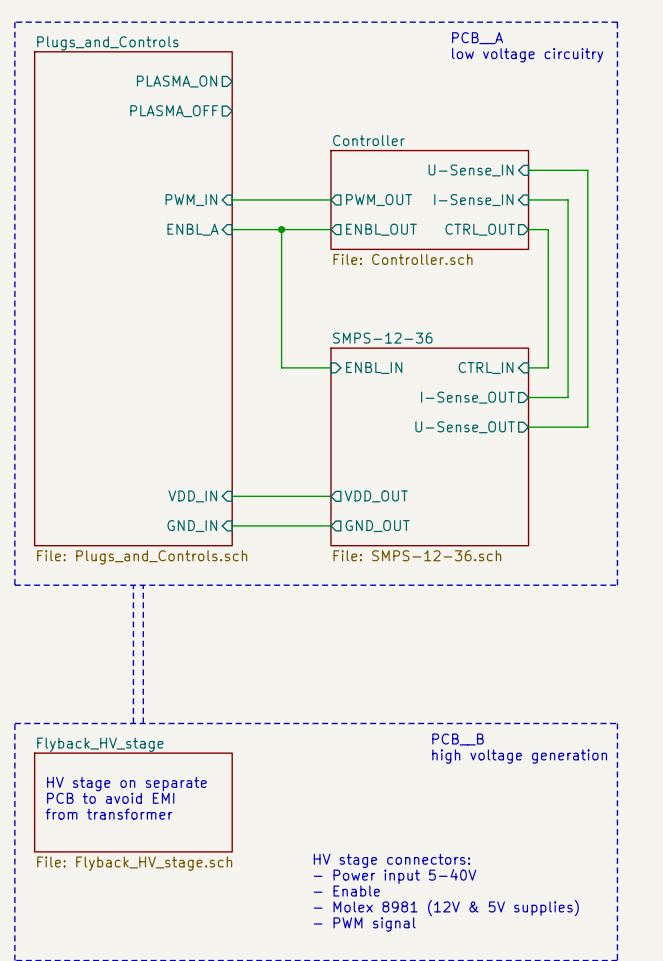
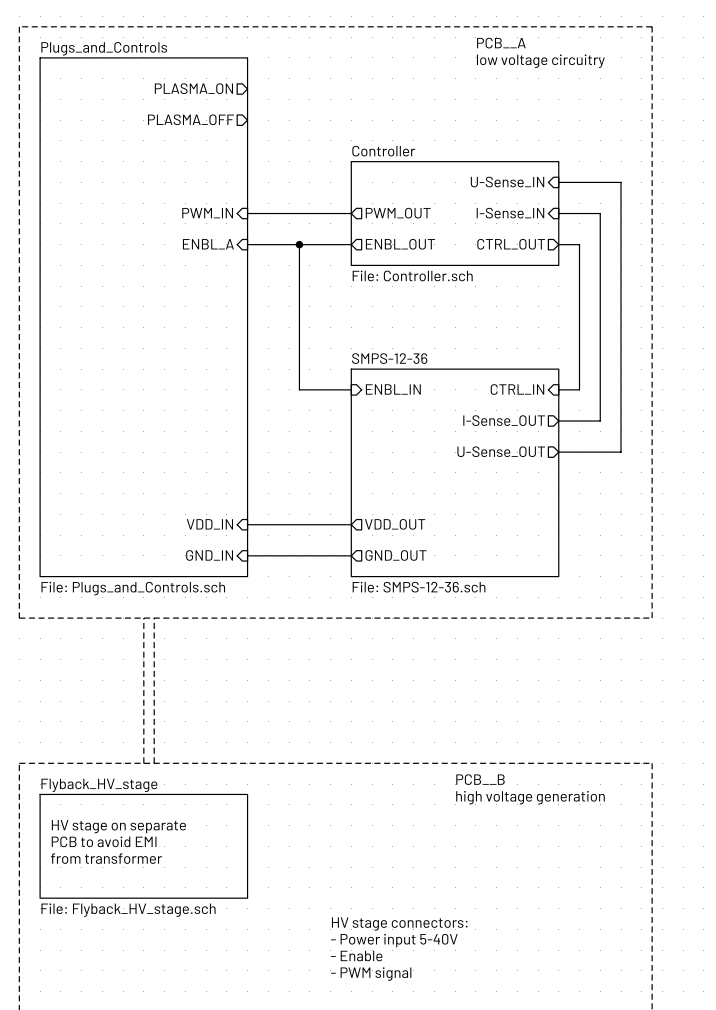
text: HV stage connectors: (391, 860) -> none
text: - Power input 5-40V (395, 876) -> HV stage connectors: (399, 924)
text: - Enable (346, 891) -> - Power input 5-40V (394, 940)
text: - Molex 8981 (12V & 5V supplies) (446, 908) -> - Enable (356, 956)

